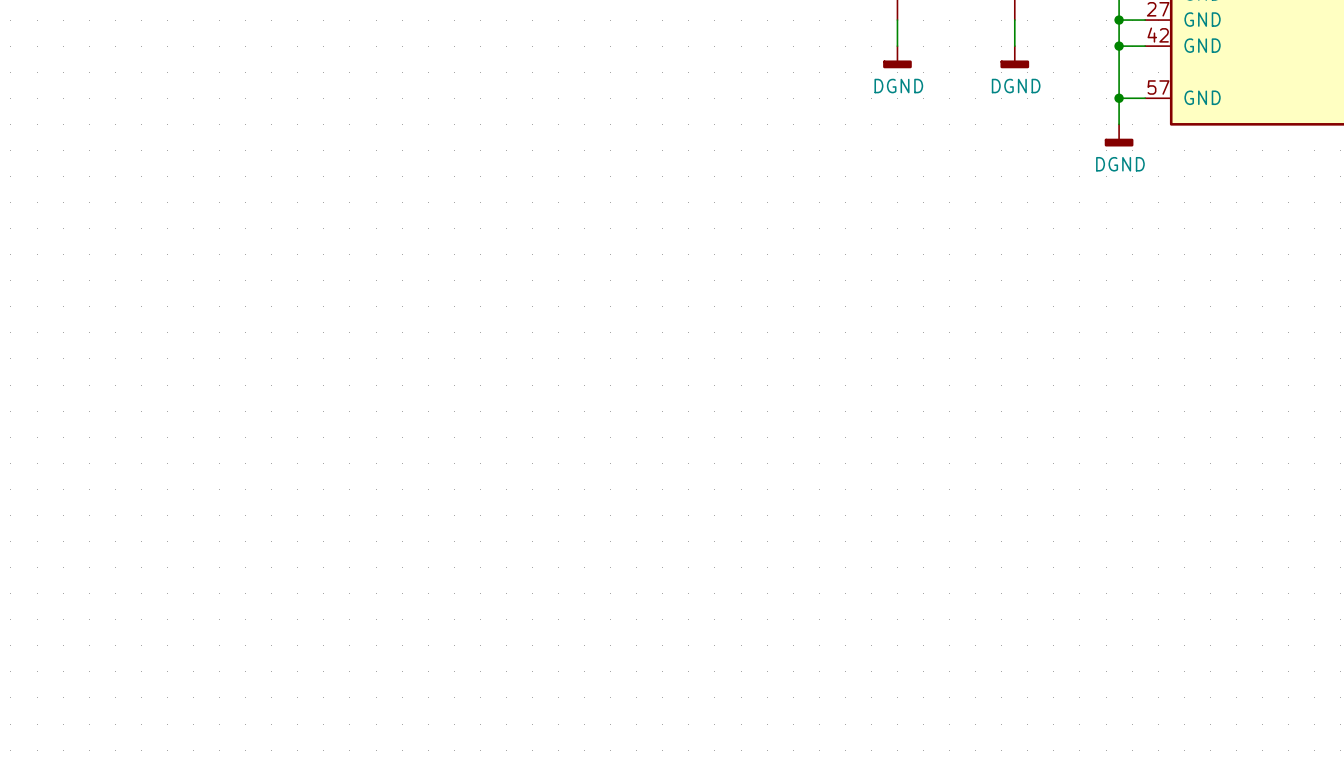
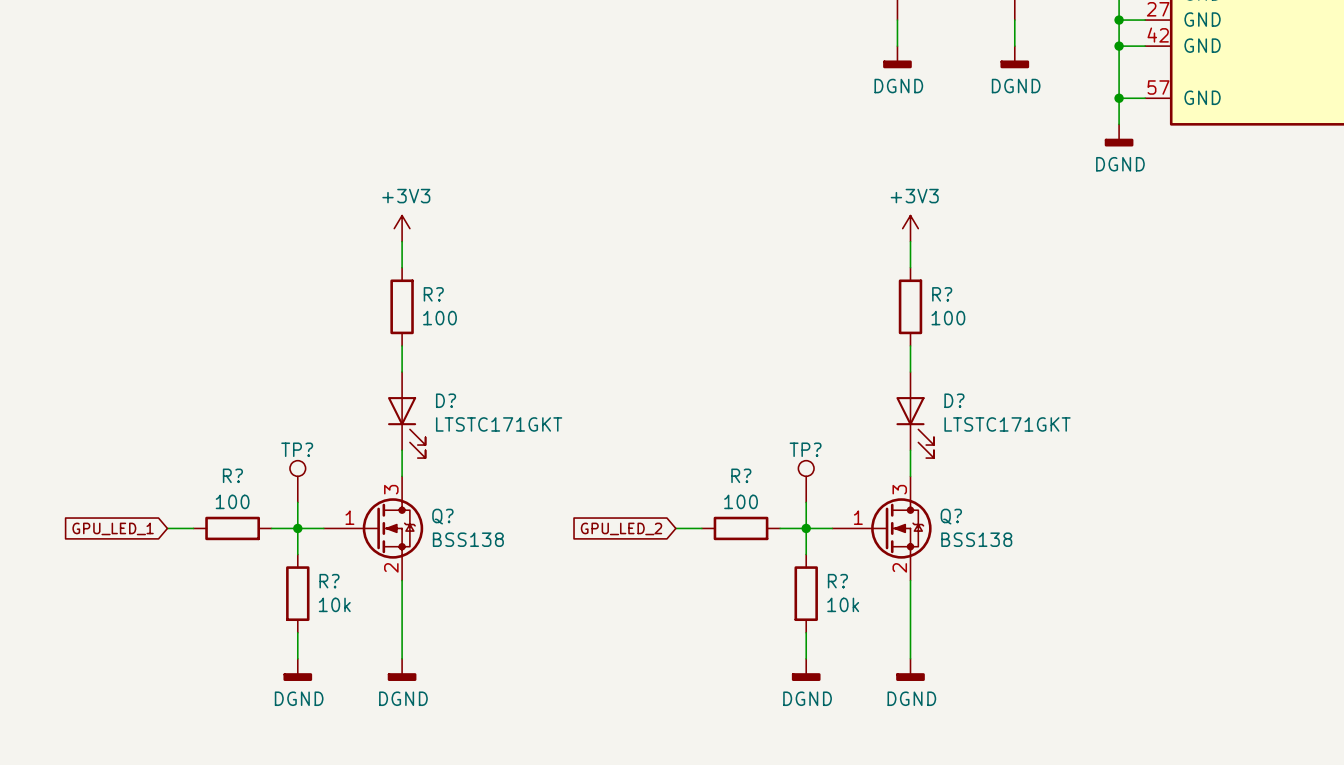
power symbol: none -> +3V3 (402, 228)
power symbol: none -> +3V3 (910, 228)
wire: none -> (402, 241) (402, 267)
wire: none -> (910, 241) (910, 267)
R?: none -> 100 (402, 306)
R?: none -> 100 (910, 306)
wire: none -> (402, 345) (402, 372)
wire: none -> (910, 345) (910, 372)
D?: none -> LTSTC171GKT (406, 415)
D?: none -> LTSTC171GKT (915, 415)
wire: none -> (402, 450) (402, 476)
wire: none -> (910, 450) (910, 476)
TP?: none -> (297, 481)
TP?: none -> (806, 481)
wire: none -> (297, 502) (297, 554)
wire: none -> (806, 502) (806, 554)
global label: none -> GPU_LED_1 (113, 528)
wire: none -> (167, 528) (193, 528)
R?: none -> 100 (232, 528)
wire: none -> (271, 528) (323, 528)
junction: none -> (297, 528)
Q?: none -> BSS138 (373, 528)
global label: none -> GPU_LED_2 (621, 528)
wire: none -> (675, 528) (701, 528)
R?: none -> 100 (741, 528)
wire: none -> (780, 528) (832, 528)
junction: none -> (806, 528)
Q?: none -> BSS138 (881, 528)
wire: none -> (402, 580) (402, 658)
wire: none -> (910, 580) (910, 658)
R?: none -> 10k (297, 593)
R?: none -> 10k (806, 593)
wire: none -> (297, 632) (297, 658)
wire: none -> (806, 632) (806, 658)
power symbol: none -> DGND (297, 669)
power symbol: none -> DGND (402, 669)
power symbol: none -> DGND (806, 669)
power symbol: none -> DGND (910, 669)

